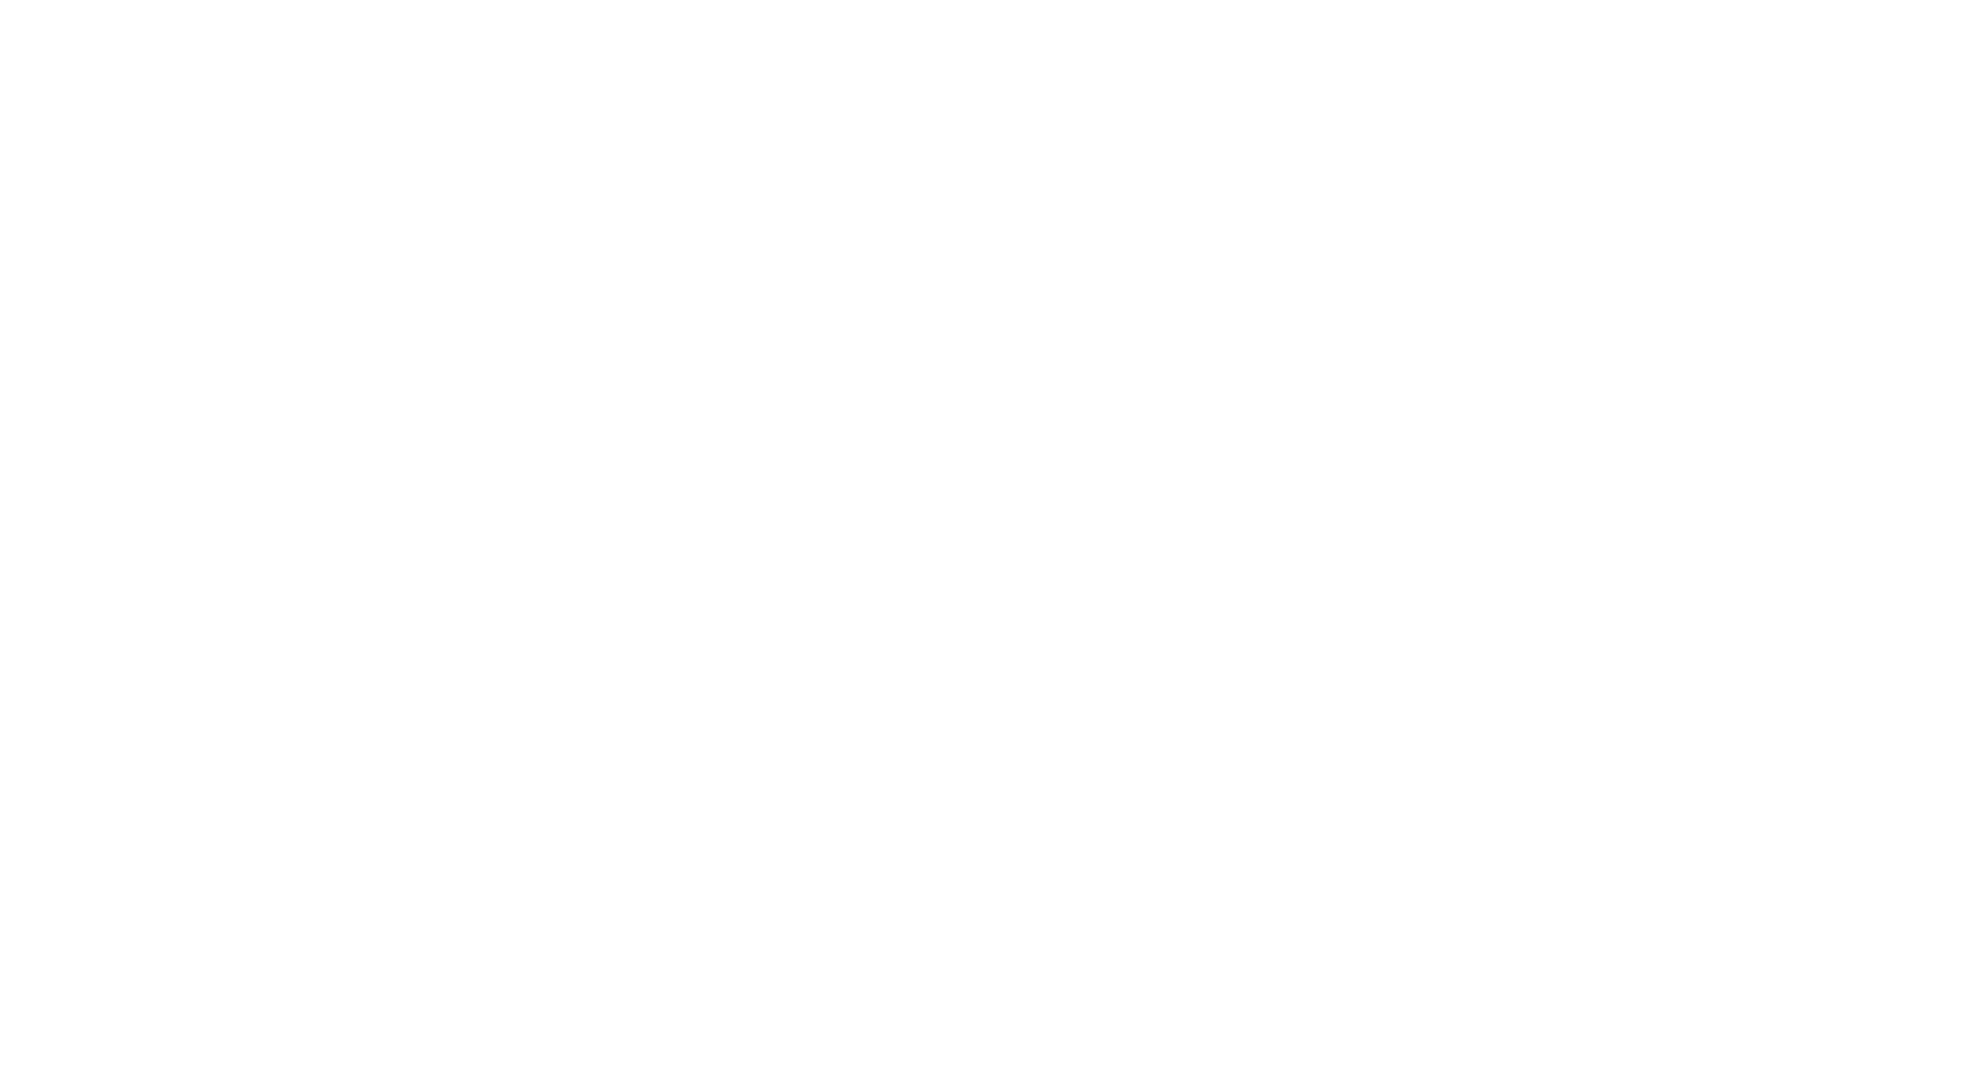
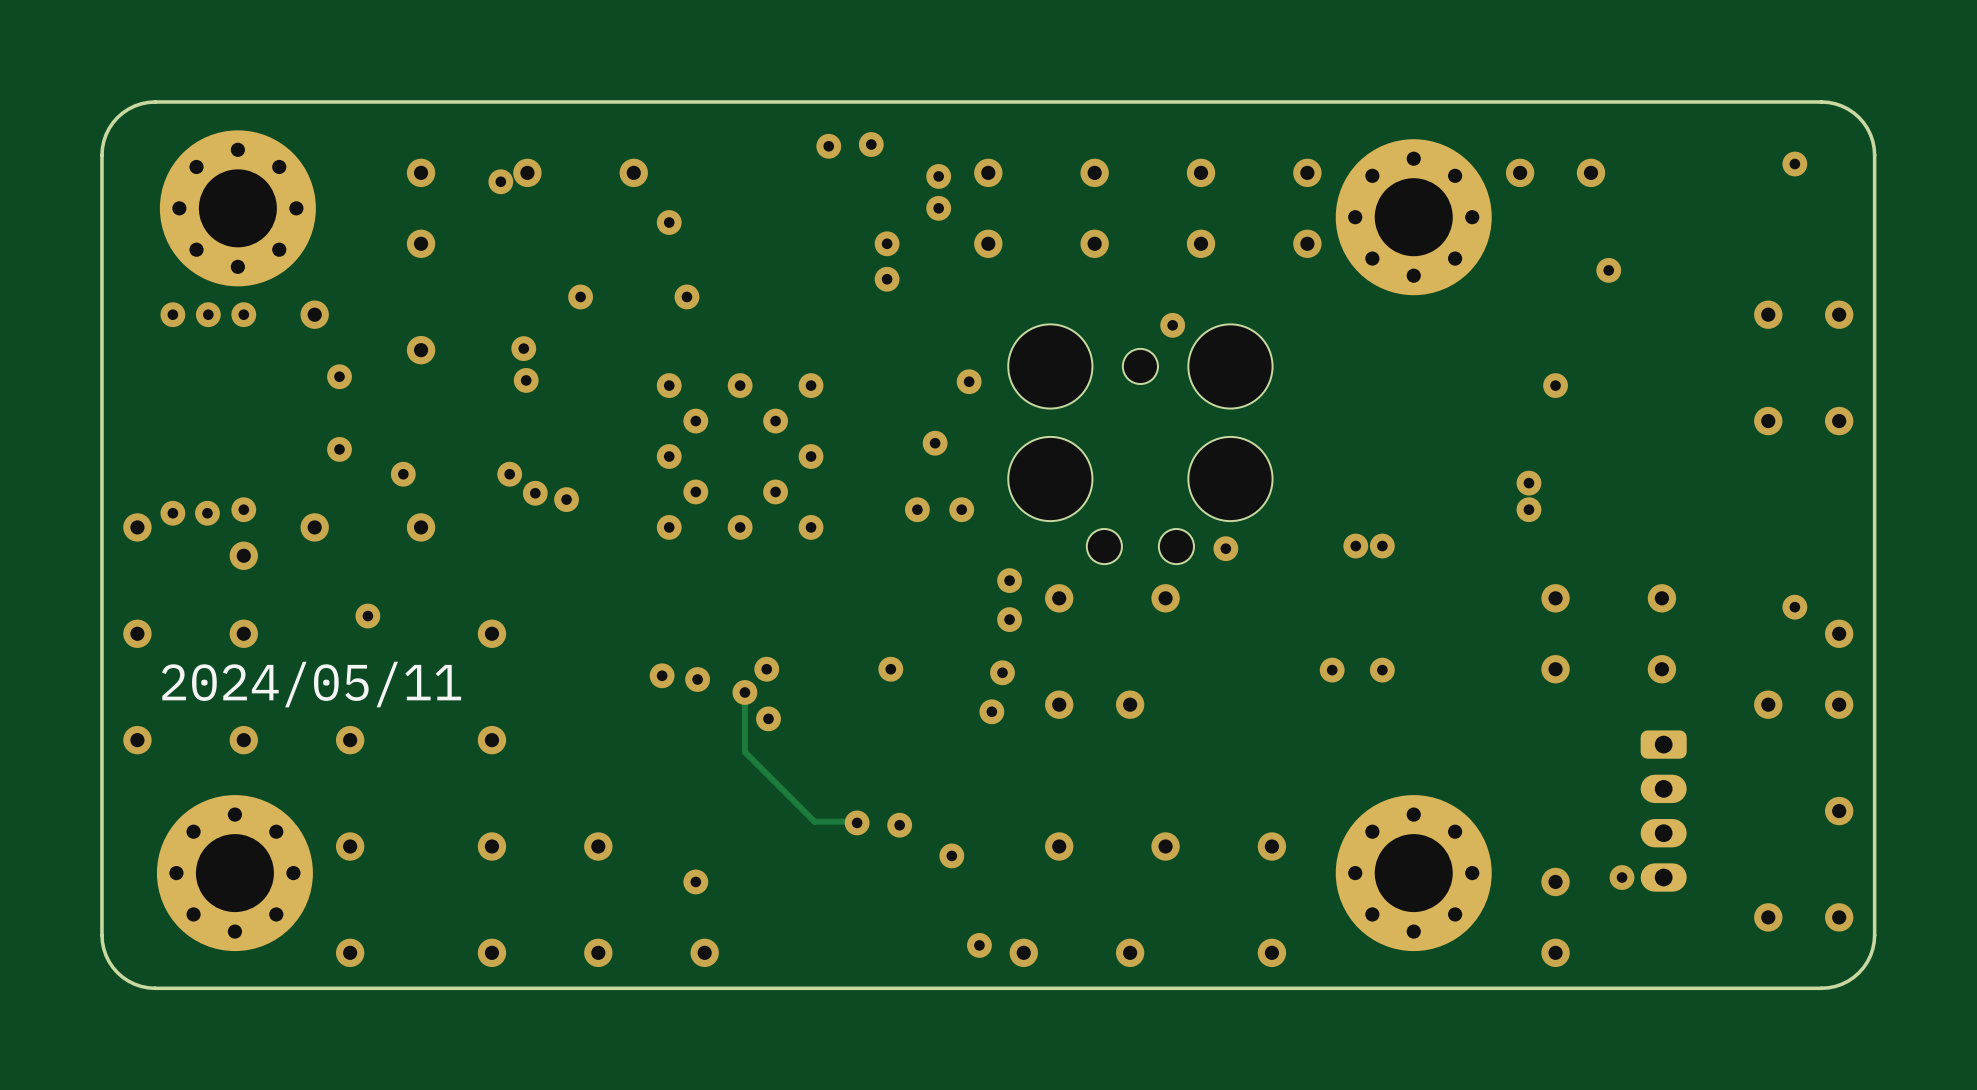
board edge: none -> (1821, 101) (155, 101) (141, 103) (128, 109) (117, 117) (109, 128) (103, 141) (101, 155) (101, 935) (103, 948) (109, 961) (117, 972) (128, 981) (141, 986) (155, 988) (1821, 988) (1835, 986) (1848, 981) (1859, 972) (1867, 961) (1872, 948) (1874, 935) (1874, 155) (1870, 134) (1859, 117) (1841, 106) (1821, 101)
via: none -> (871, 144)
via: none -> (828, 146)
via: none -> (1794, 164)
via: none -> (421, 172)
via: none -> (527, 172)
via: none -> (633, 172)
via: none -> (988, 172)
via: none -> (1094, 172)
via: none -> (1201, 172)
via: none -> (1307, 172)
via: none -> (1520, 172)
via: none -> (1591, 172)
via: none -> (938, 176)
via: none -> (500, 181)
part: none -> (237, 208)
via: none -> (938, 208)
part: none -> (1413, 217)
via: none -> (669, 222)
via: none -> (421, 243)
via: none -> (887, 243)
via: none -> (988, 243)
via: none -> (1094, 243)
via: none -> (1201, 243)
via: none -> (1307, 243)
via: none -> (1608, 270)
via: none -> (887, 279)
via: none -> (580, 296)
via: none -> (686, 296)
via: none -> (172, 314)
via: none -> (208, 314)
via: none -> (243, 314)
via: none -> (314, 314)
via: none -> (1768, 314)
via: none -> (1839, 314)
via: none -> (1172, 325)
via: none -> (523, 348)
via: none -> (421, 350)
via: none -> (339, 376)
via: none -> (526, 380)
via: none -> (969, 381)
via: none -> (669, 385)
via: none -> (740, 385)
via: none -> (811, 385)
via: none -> (1555, 385)
via: none -> (695, 421)
via: none -> (775, 421)
via: none -> (1768, 421)
via: none -> (1839, 421)
via: none -> (935, 443)
part: none -> (1140, 444)
via: none -> (339, 449)
via: none -> (669, 456)
via: none -> (811, 456)
via: none -> (403, 474)
via: none -> (509, 474)
via: none -> (1528, 483)
via: none -> (695, 491)
via: none -> (775, 491)
via: none -> (535, 493)
via: none -> (566, 499)
via: none -> (243, 509)
via: none -> (917, 509)
via: none -> (961, 509)
via: none -> (1528, 509)
via: none -> (172, 513)
via: none -> (207, 513)
via: none -> (137, 527)
via: none -> (314, 527)
via: none -> (421, 527)
via: none -> (669, 527)
via: none -> (740, 527)
via: none -> (811, 527)
via: none -> (1355, 546)
via: none -> (1382, 546)
via: none -> (1225, 548)
via: none -> (243, 555)
via: none -> (1009, 580)
via: none -> (1059, 598)
via: none -> (1165, 598)
via: none -> (1555, 598)
via: none -> (1661, 598)
via: none -> (1794, 607)
via: none -> (367, 616)
via: none -> (1009, 619)
via: none -> (137, 633)
via: none -> (243, 633)
via: none -> (491, 633)
via: none -> (1839, 633)
via: none -> (766, 669)
via: none -> (890, 669)
via: none -> (1555, 669)
via: none -> (1661, 669)
via: none -> (1332, 670)
via: none -> (1382, 670)
via: none -> (1002, 672)
via: none -> (662, 675)
via: none -> (697, 679)
text: none -> 2024/05/11 (311, 684)
track: none -> (744, 692) (744, 752) (814, 821) (857, 822)
via: none -> (744, 692)
via: none -> (1059, 704)
via: none -> (1130, 704)
via: none -> (1768, 704)
via: none -> (1839, 704)
via: none -> (991, 711)
via: none -> (768, 718)
via: none -> (137, 740)
via: none -> (243, 740)
via: none -> (350, 740)
via: none -> (491, 740)
part: none -> (1663, 811)
via: none -> (1839, 811)
via: none -> (857, 822)
via: none -> (899, 825)
via: none -> (350, 846)
via: none -> (491, 846)
via: none -> (598, 846)
via: none -> (1059, 846)
via: none -> (1165, 846)
via: none -> (1271, 846)
via: none -> (951, 855)
part: none -> (234, 873)
part: none -> (1413, 873)
via: none -> (1622, 877)
via: none -> (695, 881)
via: none -> (1555, 881)
via: none -> (1768, 917)
via: none -> (1839, 917)
via: none -> (979, 945)
via: none -> (350, 952)
via: none -> (491, 952)
via: none -> (598, 952)
via: none -> (704, 952)
via: none -> (1023, 952)
via: none -> (1130, 952)
via: none -> (1271, 952)
via: none -> (1555, 952)

